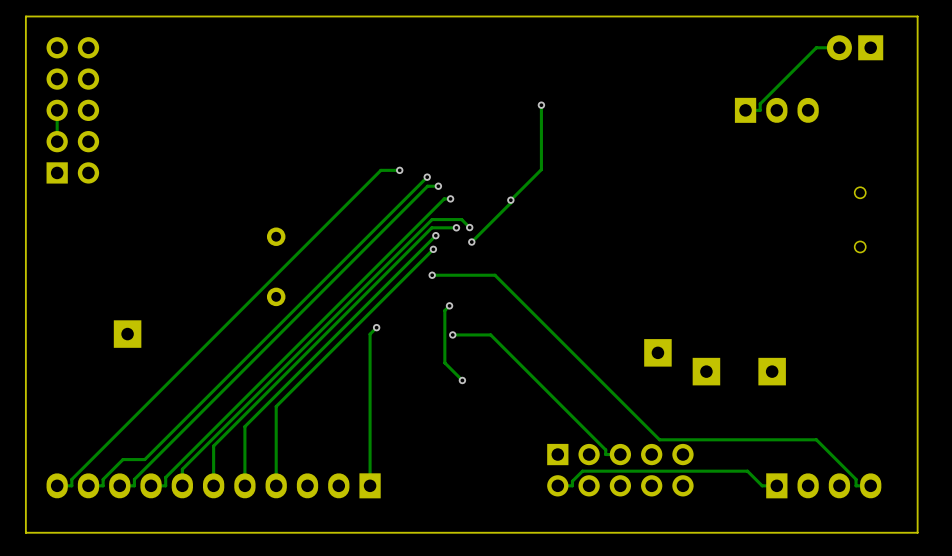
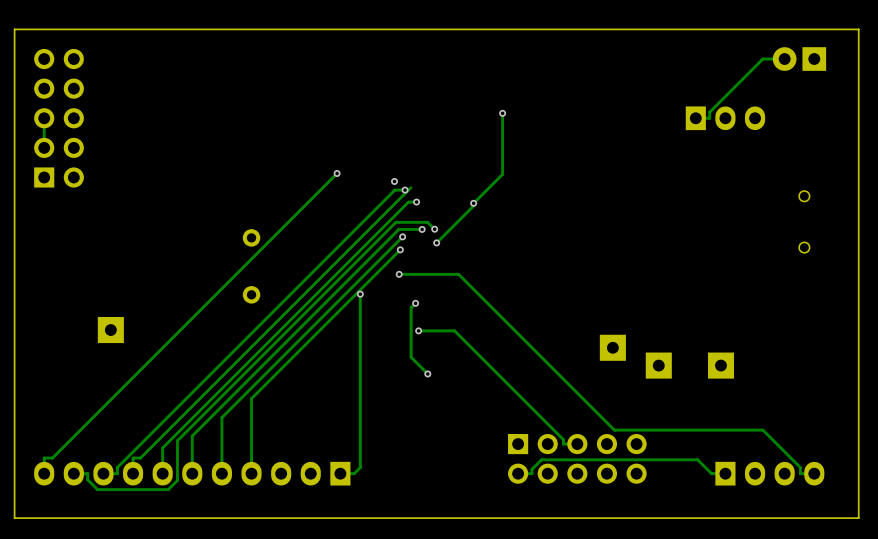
track: (399, 170) (380, 170) (71, 479) (71, 485) (57, 485) -> (337, 173) (52, 458) (44, 458) (44, 473)
via position: (399, 170) -> (337, 173)
track: (427, 177) (144, 459) (122, 459) (103, 479) (103, 485) -> (434, 229) (427, 222) (395, 222) (177, 440) (177, 480) (168, 489) (97, 489) (87, 479) (87, 473)
track: (444, 198) (165, 477) (165, 485) (151, 485) -> (410, 187) (140, 458) (133, 458) (133, 473)
track: (469, 227) (461, 219) (432, 219) (182, 469) -> (410, 202) (162, 447) (162, 458)
track: (376, 327) (370, 334) (370, 485) -> (360, 294) (360, 467) (354, 473) (340, 473)
via position: (376, 327) -> (360, 294)

